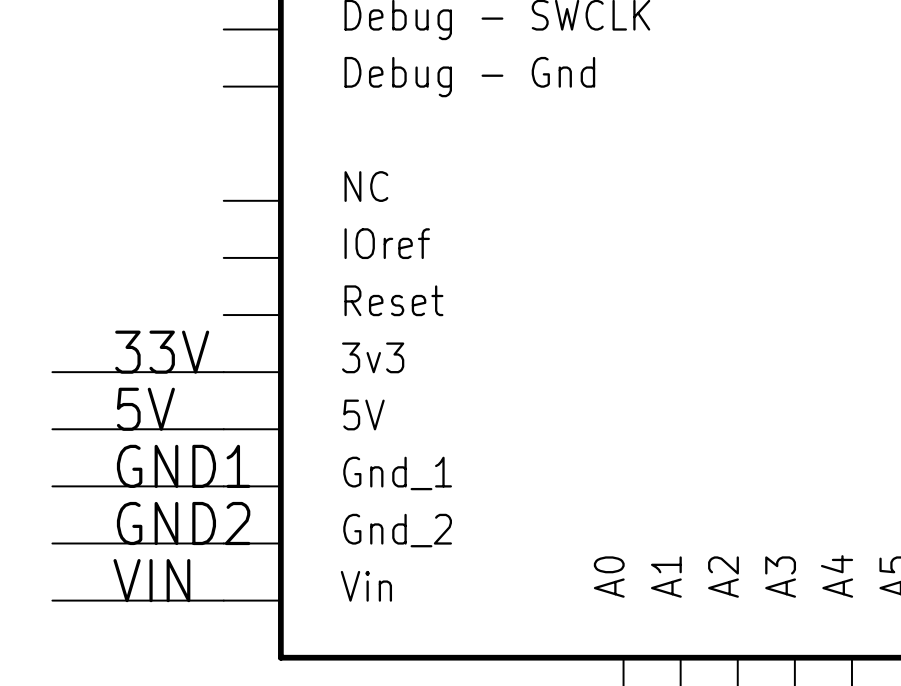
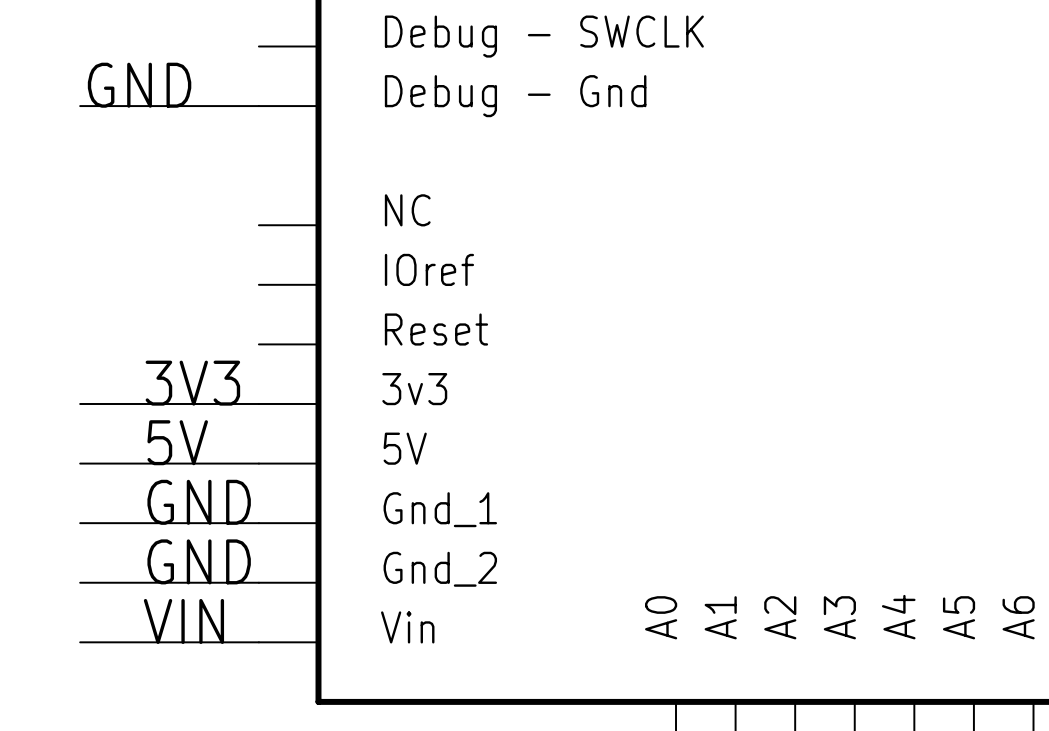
label: none -> GND (139, 85)
wire: none -> (80, 106) (258, 106)
label: 33V (162, 352) -> 3V3 (192, 383)
label: GND1 (183, 466) -> GND (199, 502)
label: GND2 (183, 523) -> GND (199, 561)

